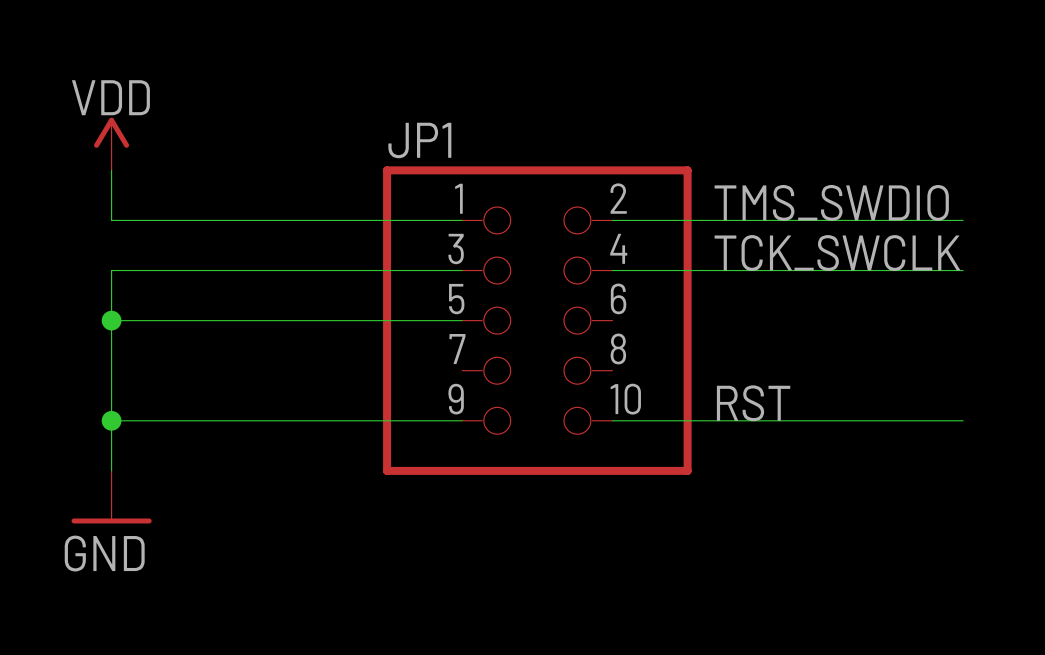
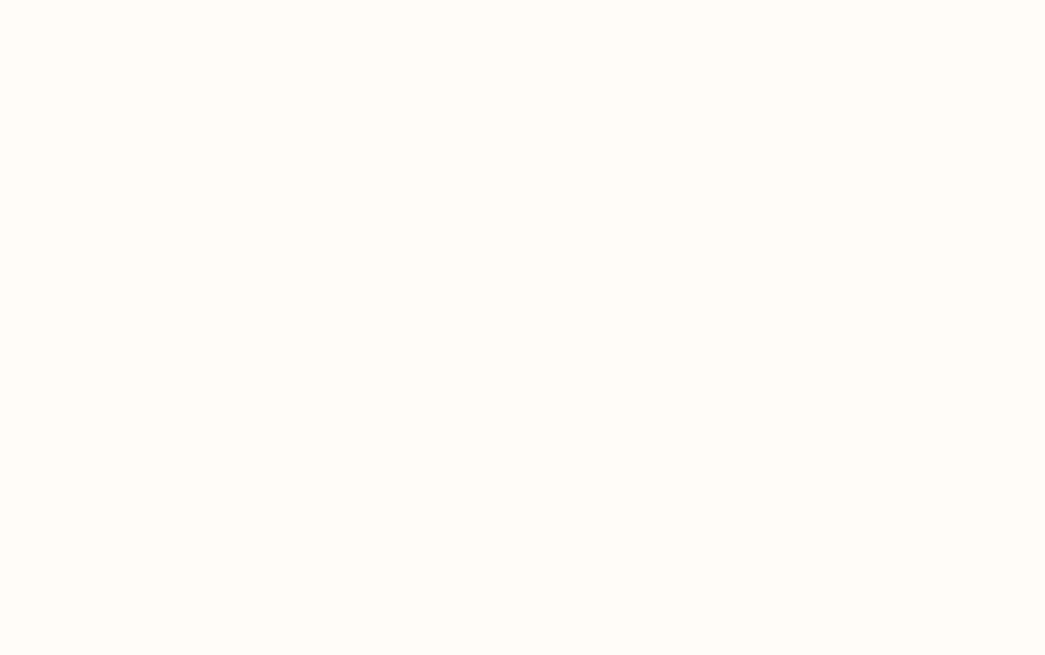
power symbol: VDD (111, 144) -> none
wire: (111, 170) (111, 220) (462, 220) -> none
label: TMS_SWDIO (831, 202) -> none
wire: (612, 220) (963, 220) -> none
label: TCK_SWCLK (837, 253) -> none
wire: (462, 270) (111, 270) (111, 470) -> none
wire: (612, 270) (963, 270) -> none
wire: (111, 320) (462, 320) -> none
junction: (111, 320) -> none
JP1: (537, 320) -> none
label: RST (753, 403) -> none
wire: (111, 420) (462, 420) -> none
junction: (111, 420) -> none
wire: (612, 420) (963, 420) -> none
power symbol: GND (111, 497) -> none

